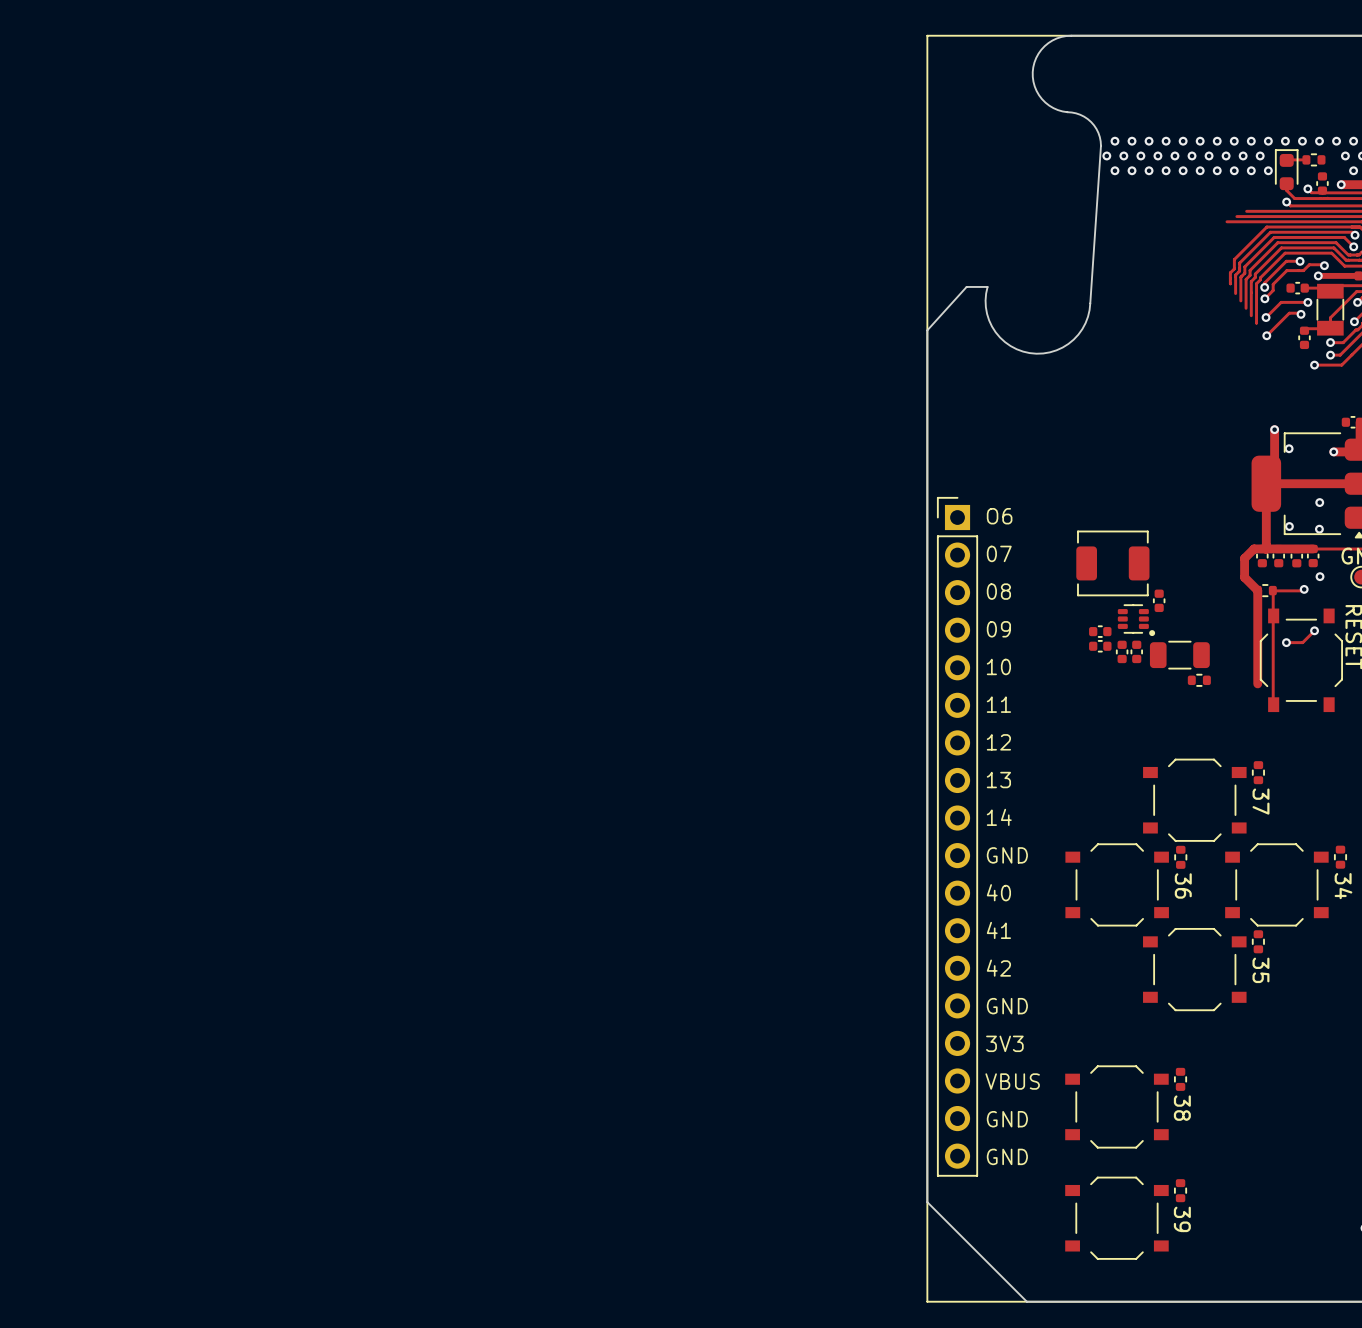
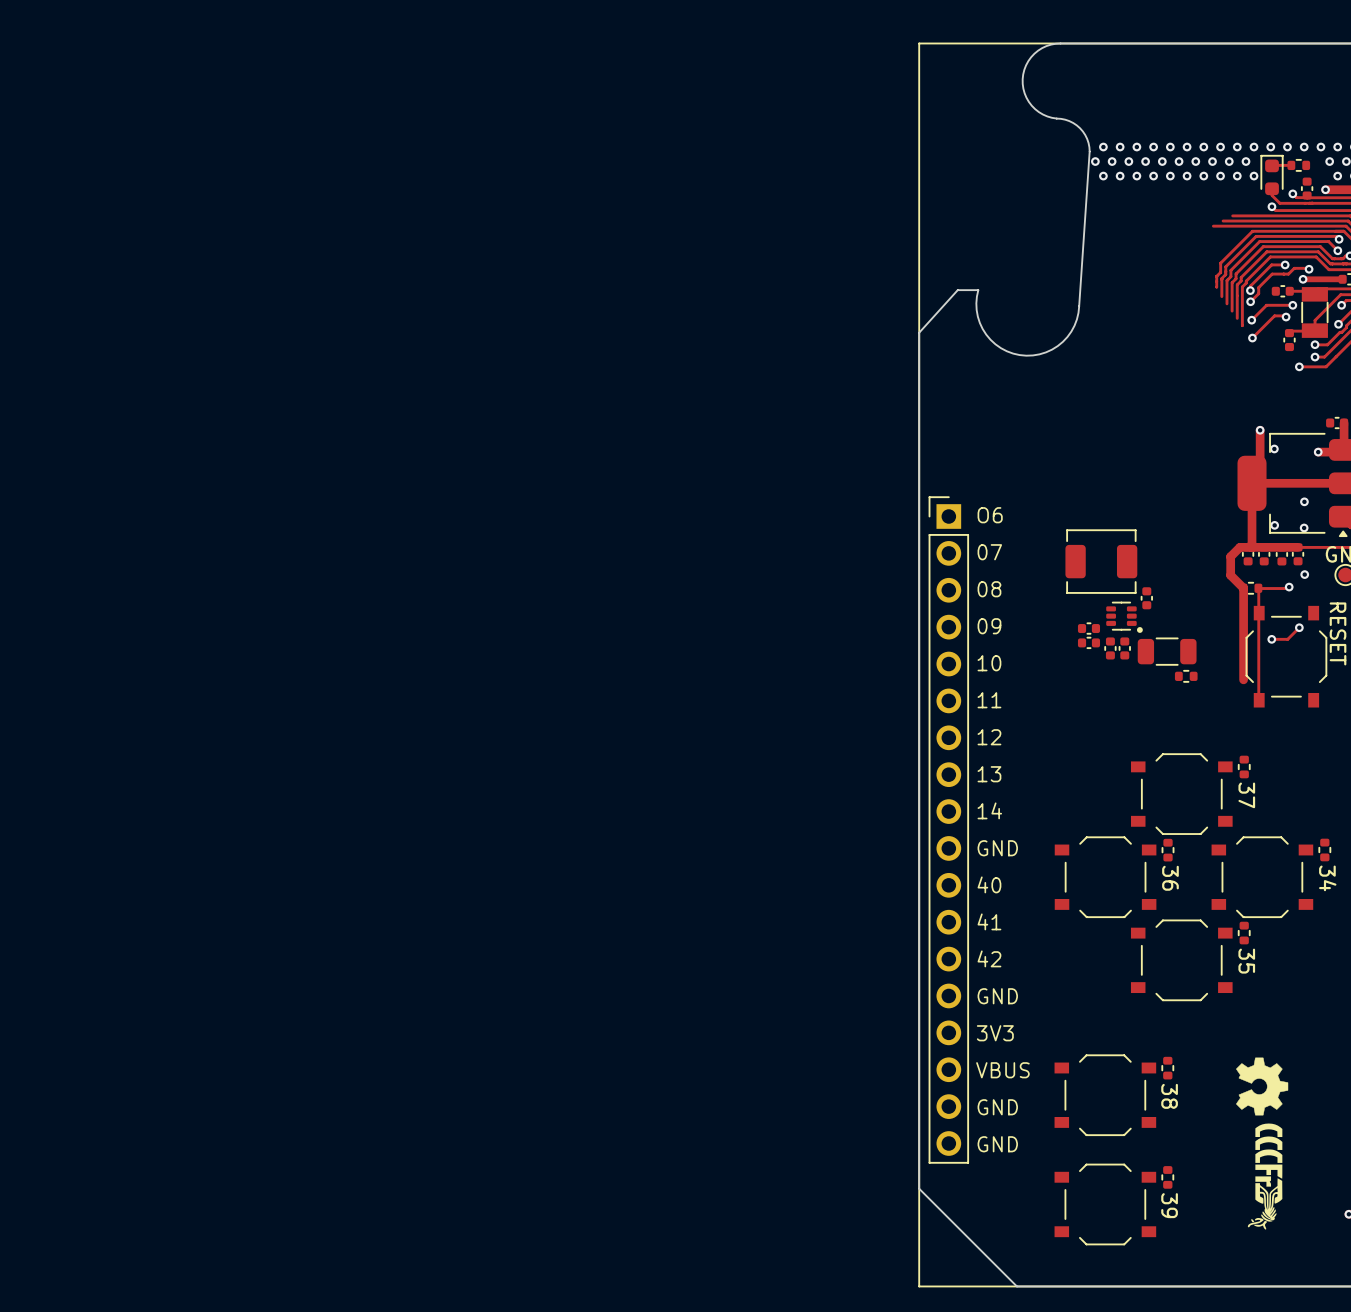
drawing: none -> [1236, 1057, 1289, 1230]

